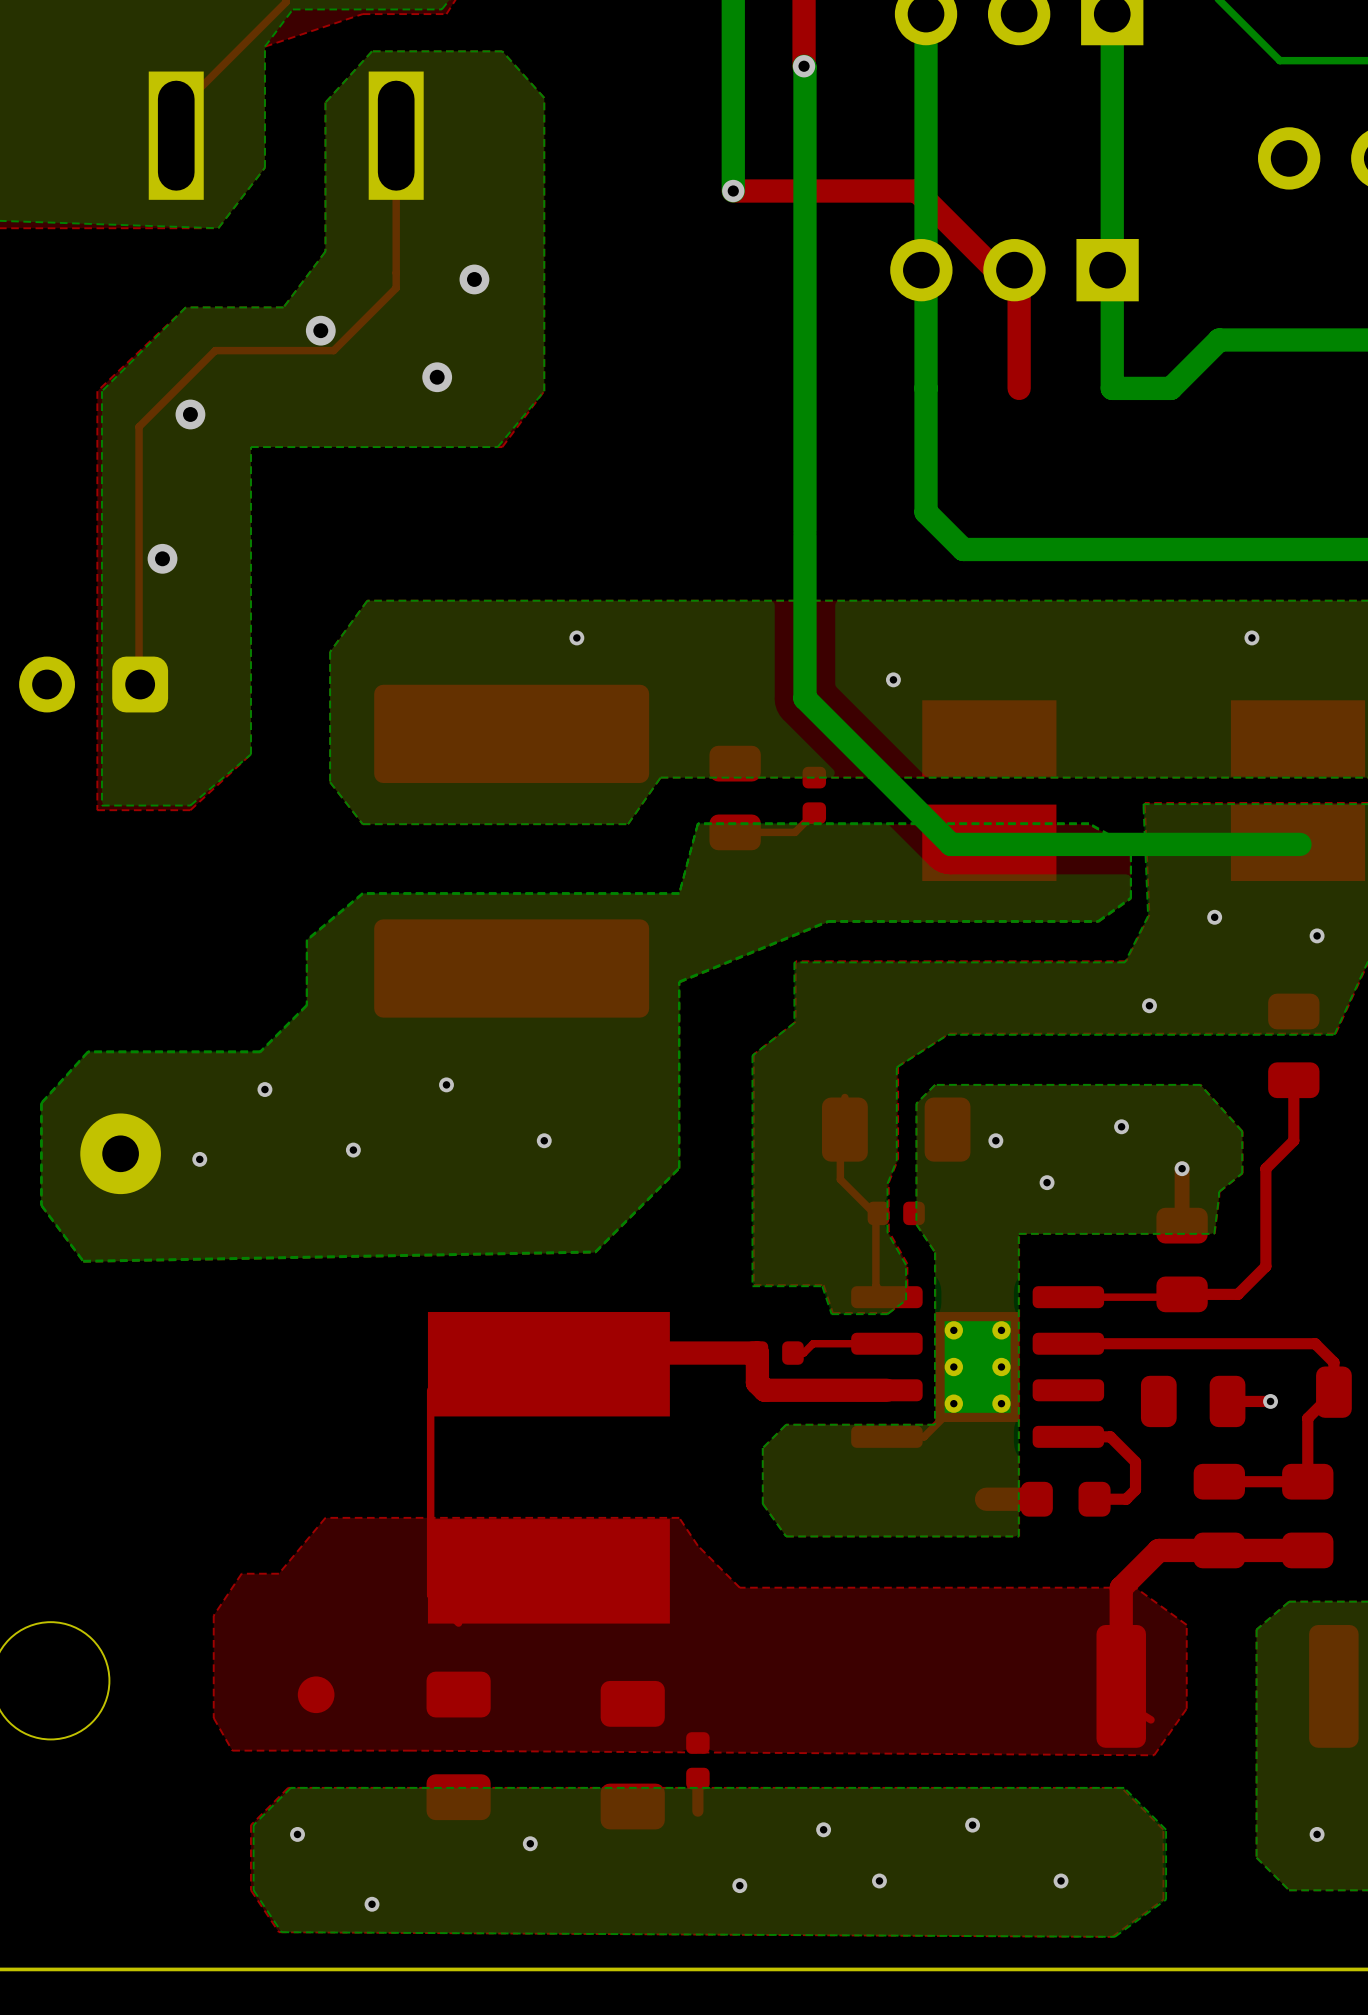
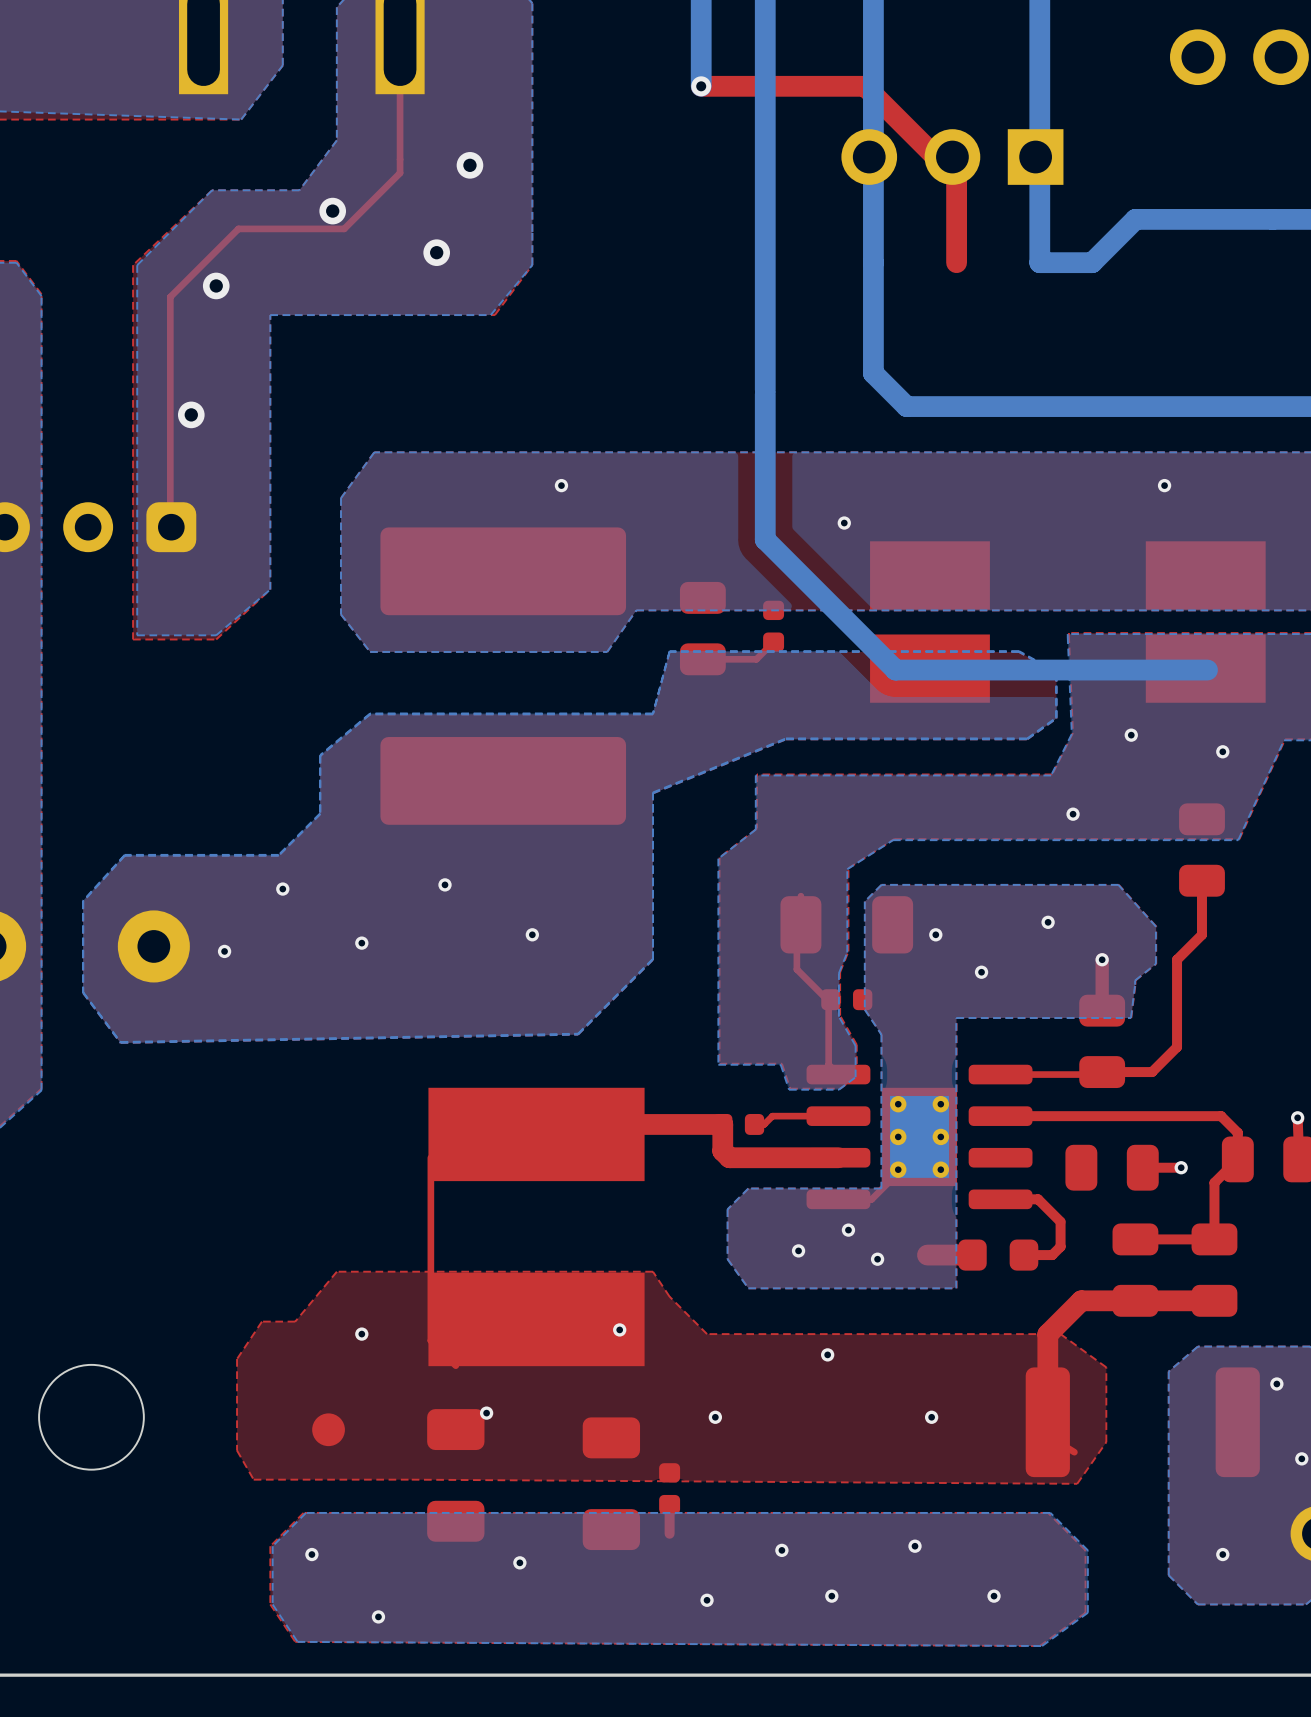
via: none -> (848, 1230)
via: none -> (798, 1250)
via: none -> (877, 1259)
via: none -> (619, 1329)
via: none -> (361, 1334)
via: none -> (827, 1354)
via: none -> (486, 1413)
via: none -> (715, 1417)
via: none -> (931, 1417)

